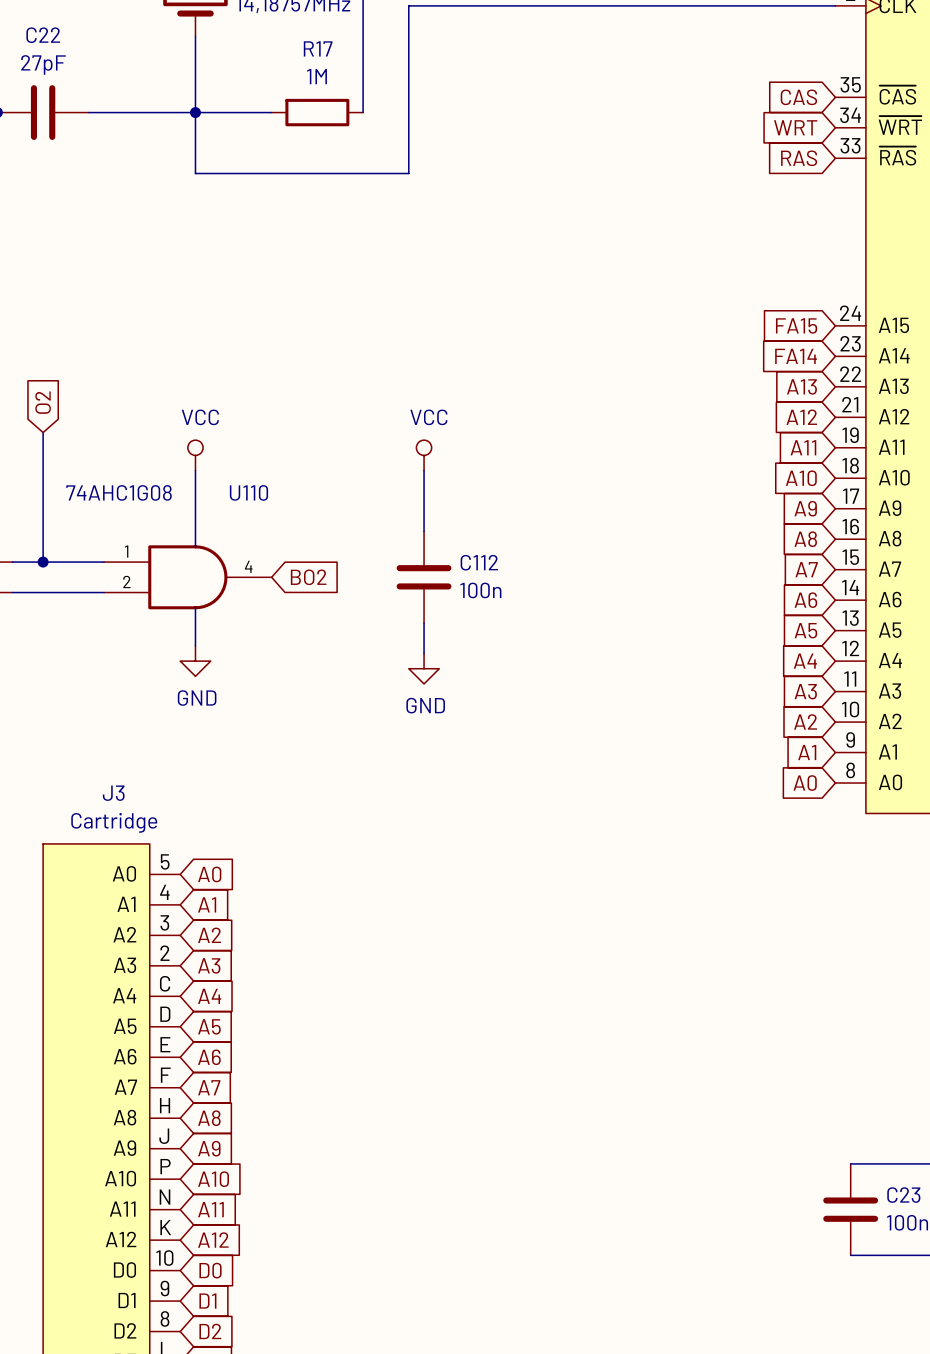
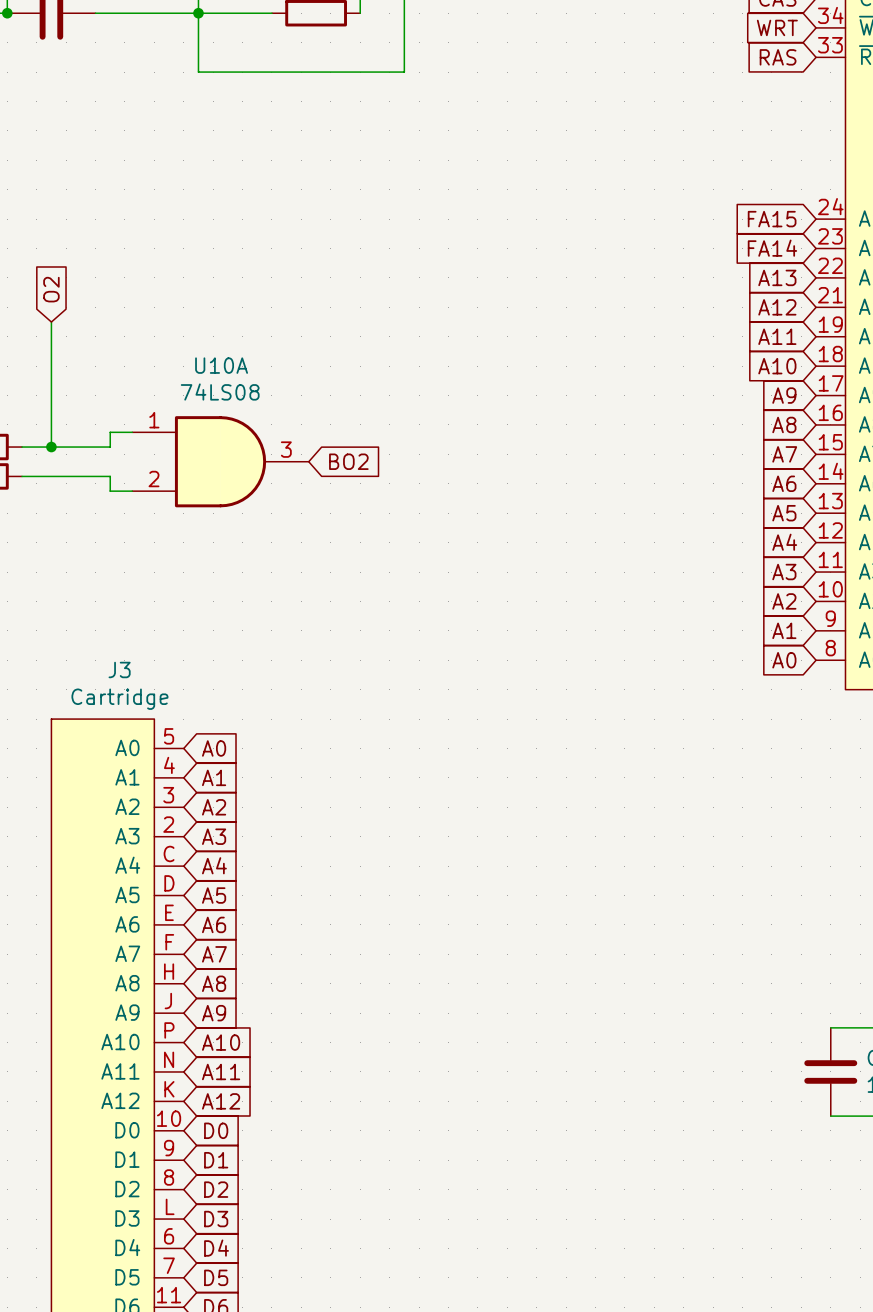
power symbol: VCC (195, 455) -> none
power symbol: VCC (424, 455) -> none
wire: (195, 470) (195, 546) -> none
wire: (424, 470) (424, 531) -> none
wire: none -> (132, 432) (110, 432) (110, 447)
U110: 74AHC1G08 (187, 577) -> none
U10A: none -> 74LS08 (220, 461)
global label position: BO2 (308, 577) -> BO2 (348, 461)
C112: 100n (424, 577) -> none
wire: none -> (110, 476) (110, 491) (132, 491)
wire: (195, 607) (195, 645) -> none
wire: (424, 623) (424, 653) -> none
power symbol: GND (195, 661) -> none
power symbol: GND (424, 668) -> none

